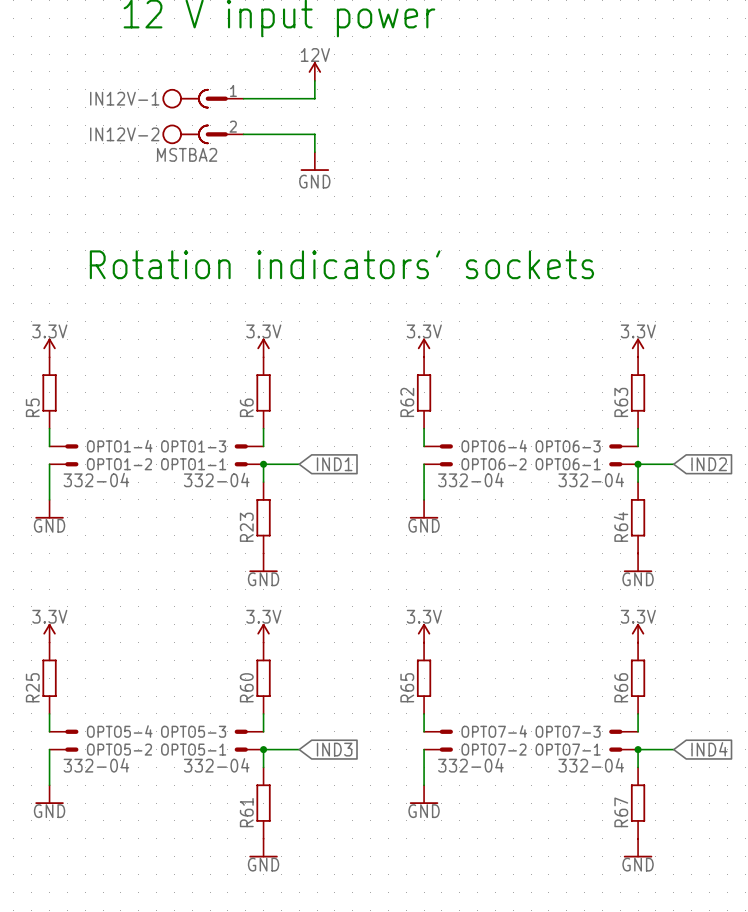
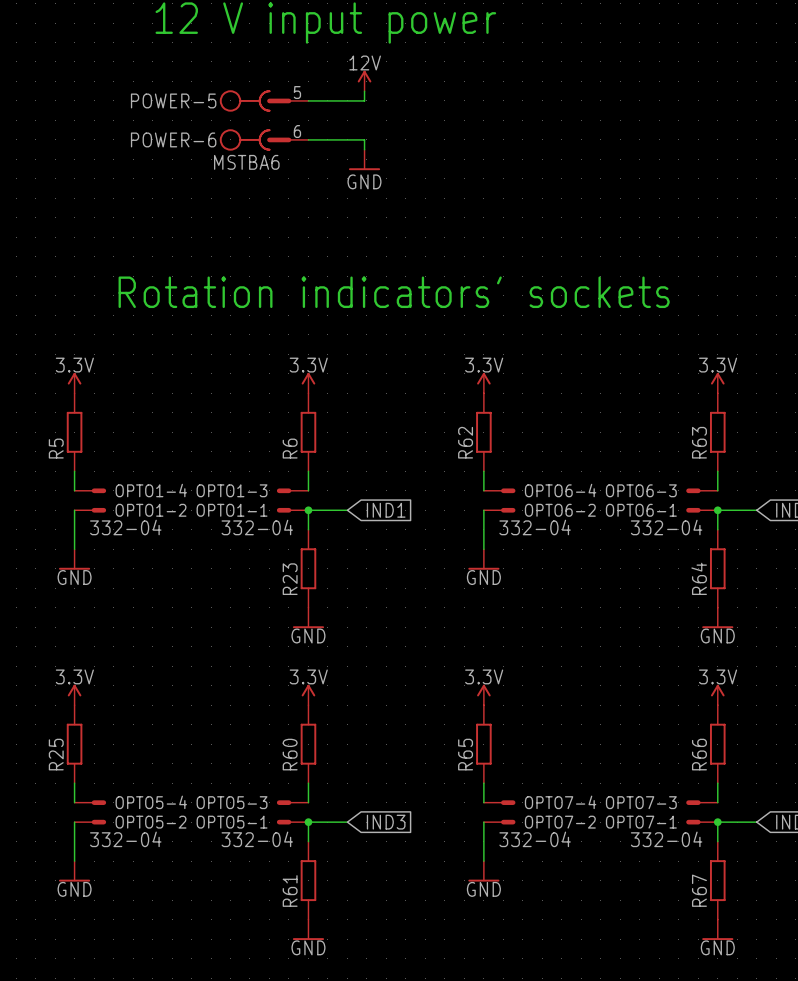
POWER-5: none -> (264, 100)
wire: (314, 89) (314, 98) (243, 98) -> (364, 100) (308, 100)
IN12V-1: (202, 98) -> none
POWER-6: none -> MSTBA6 (264, 139)
wire: none -> (308, 139) (364, 139) (364, 149)
IN12V-2: MSTBA2 (202, 134) -> none
wire: (243, 134) (314, 134) (314, 152) -> none
power symbol position: GND (314, 161) -> GND (364, 159)

